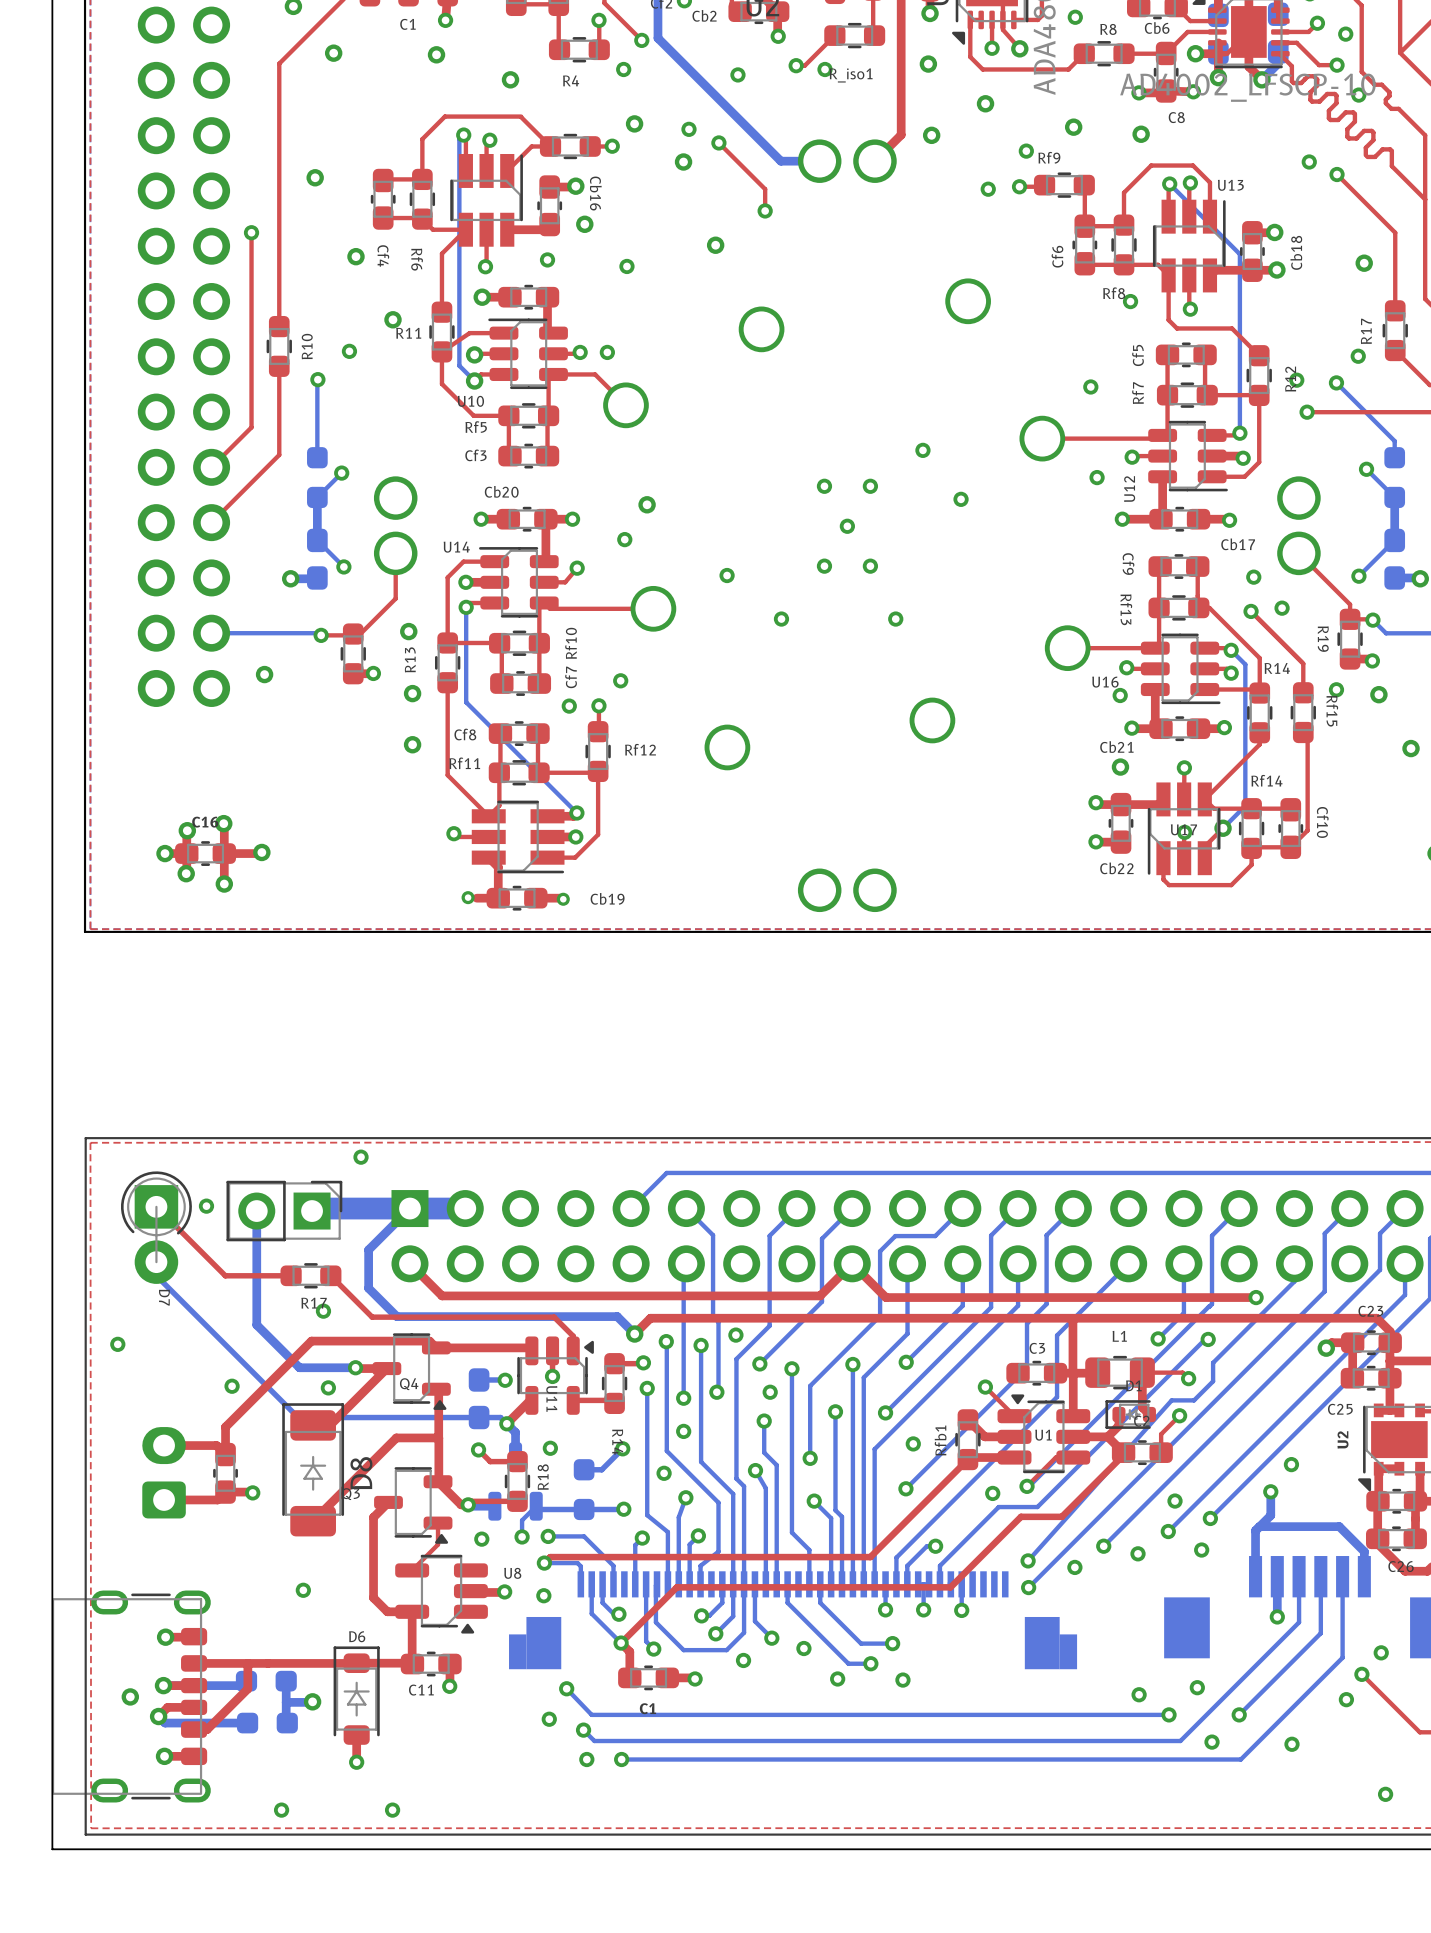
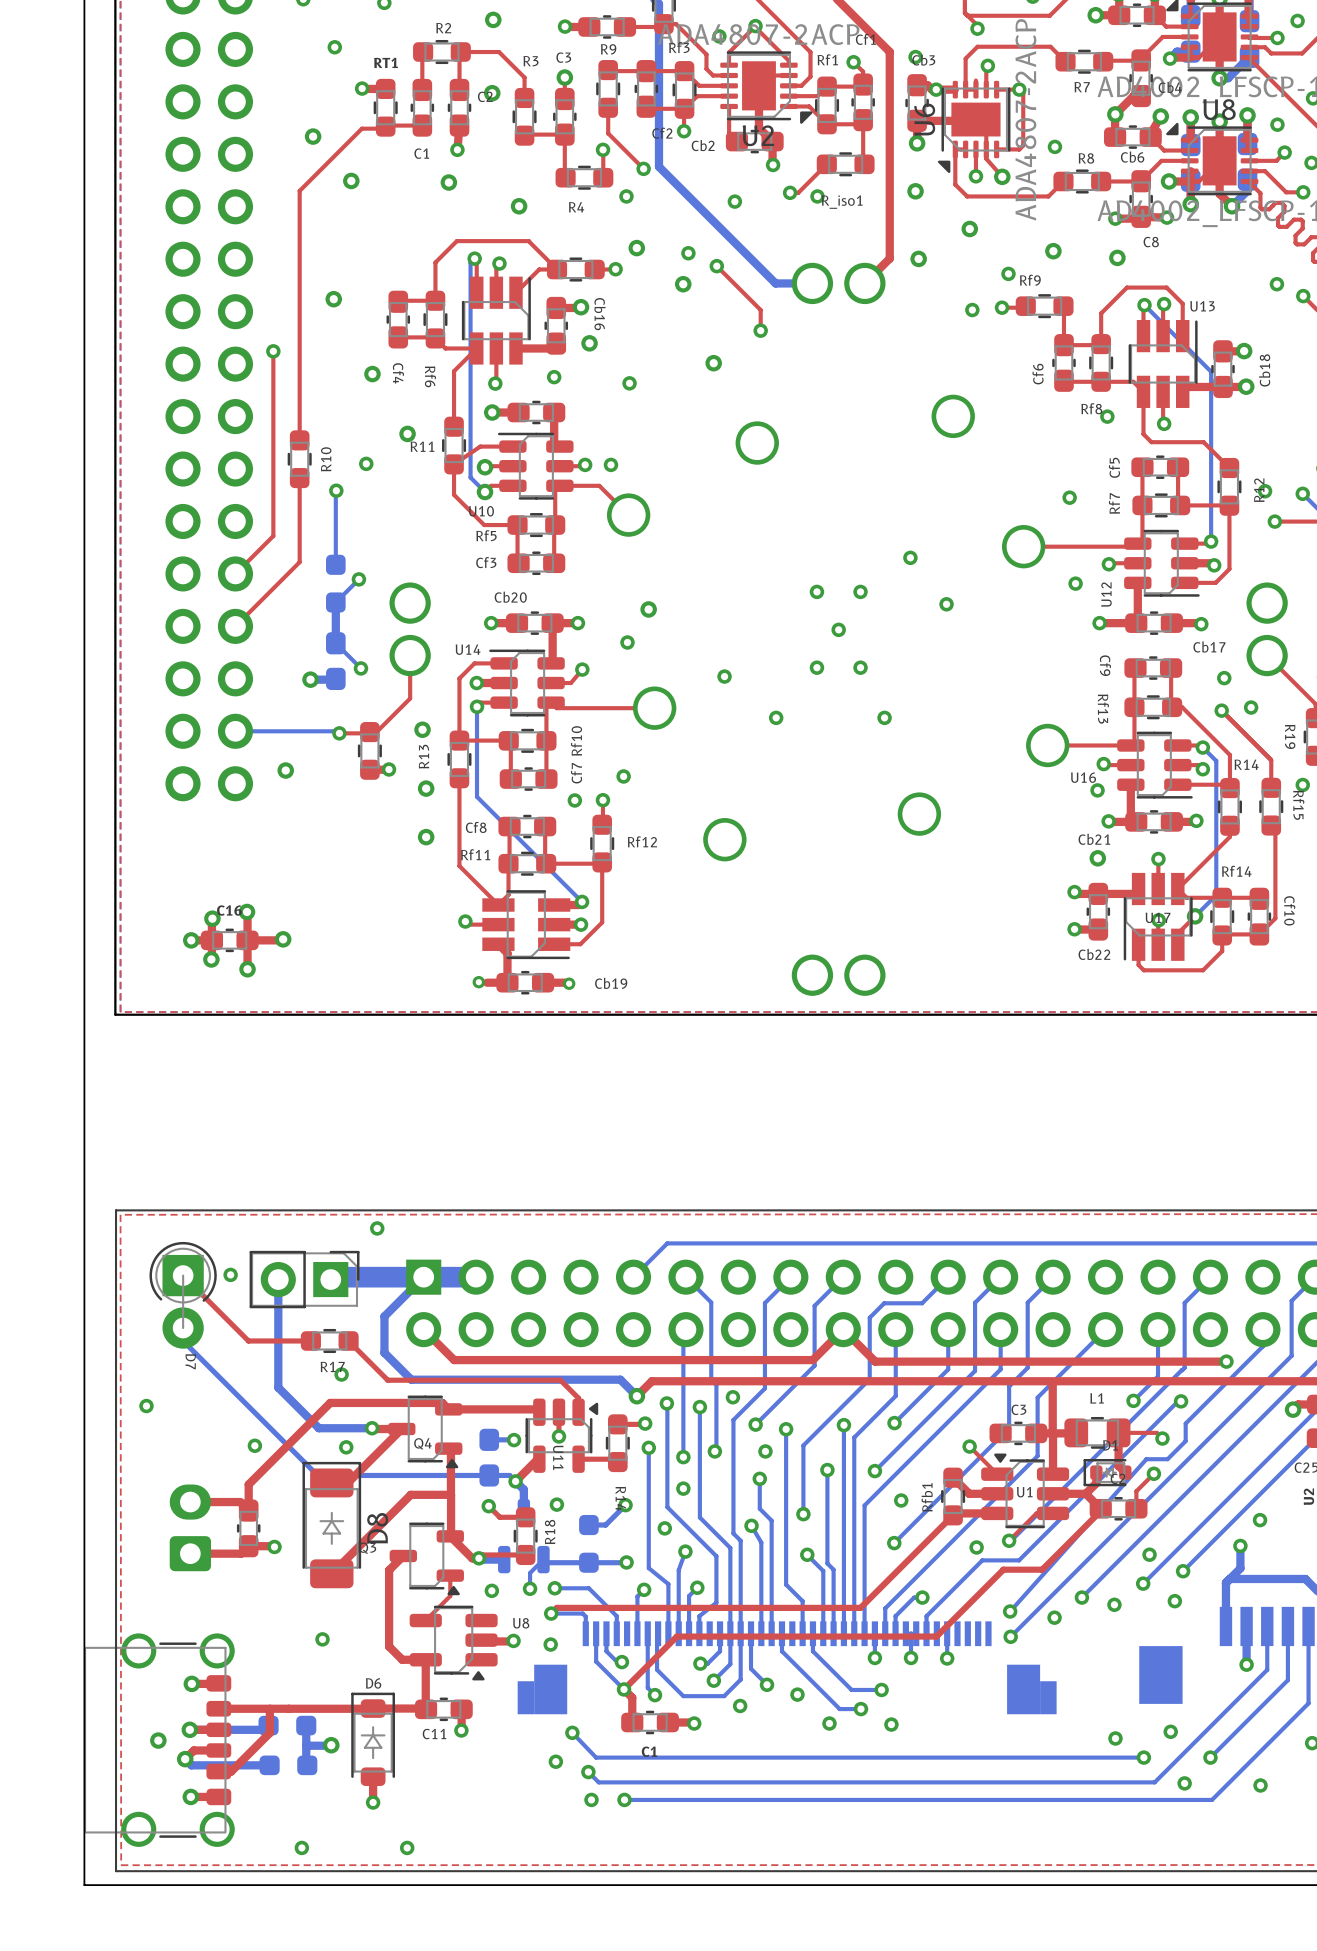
part footprint: [51, 1590, 211, 1803] -> [84, 1633, 235, 1847]

